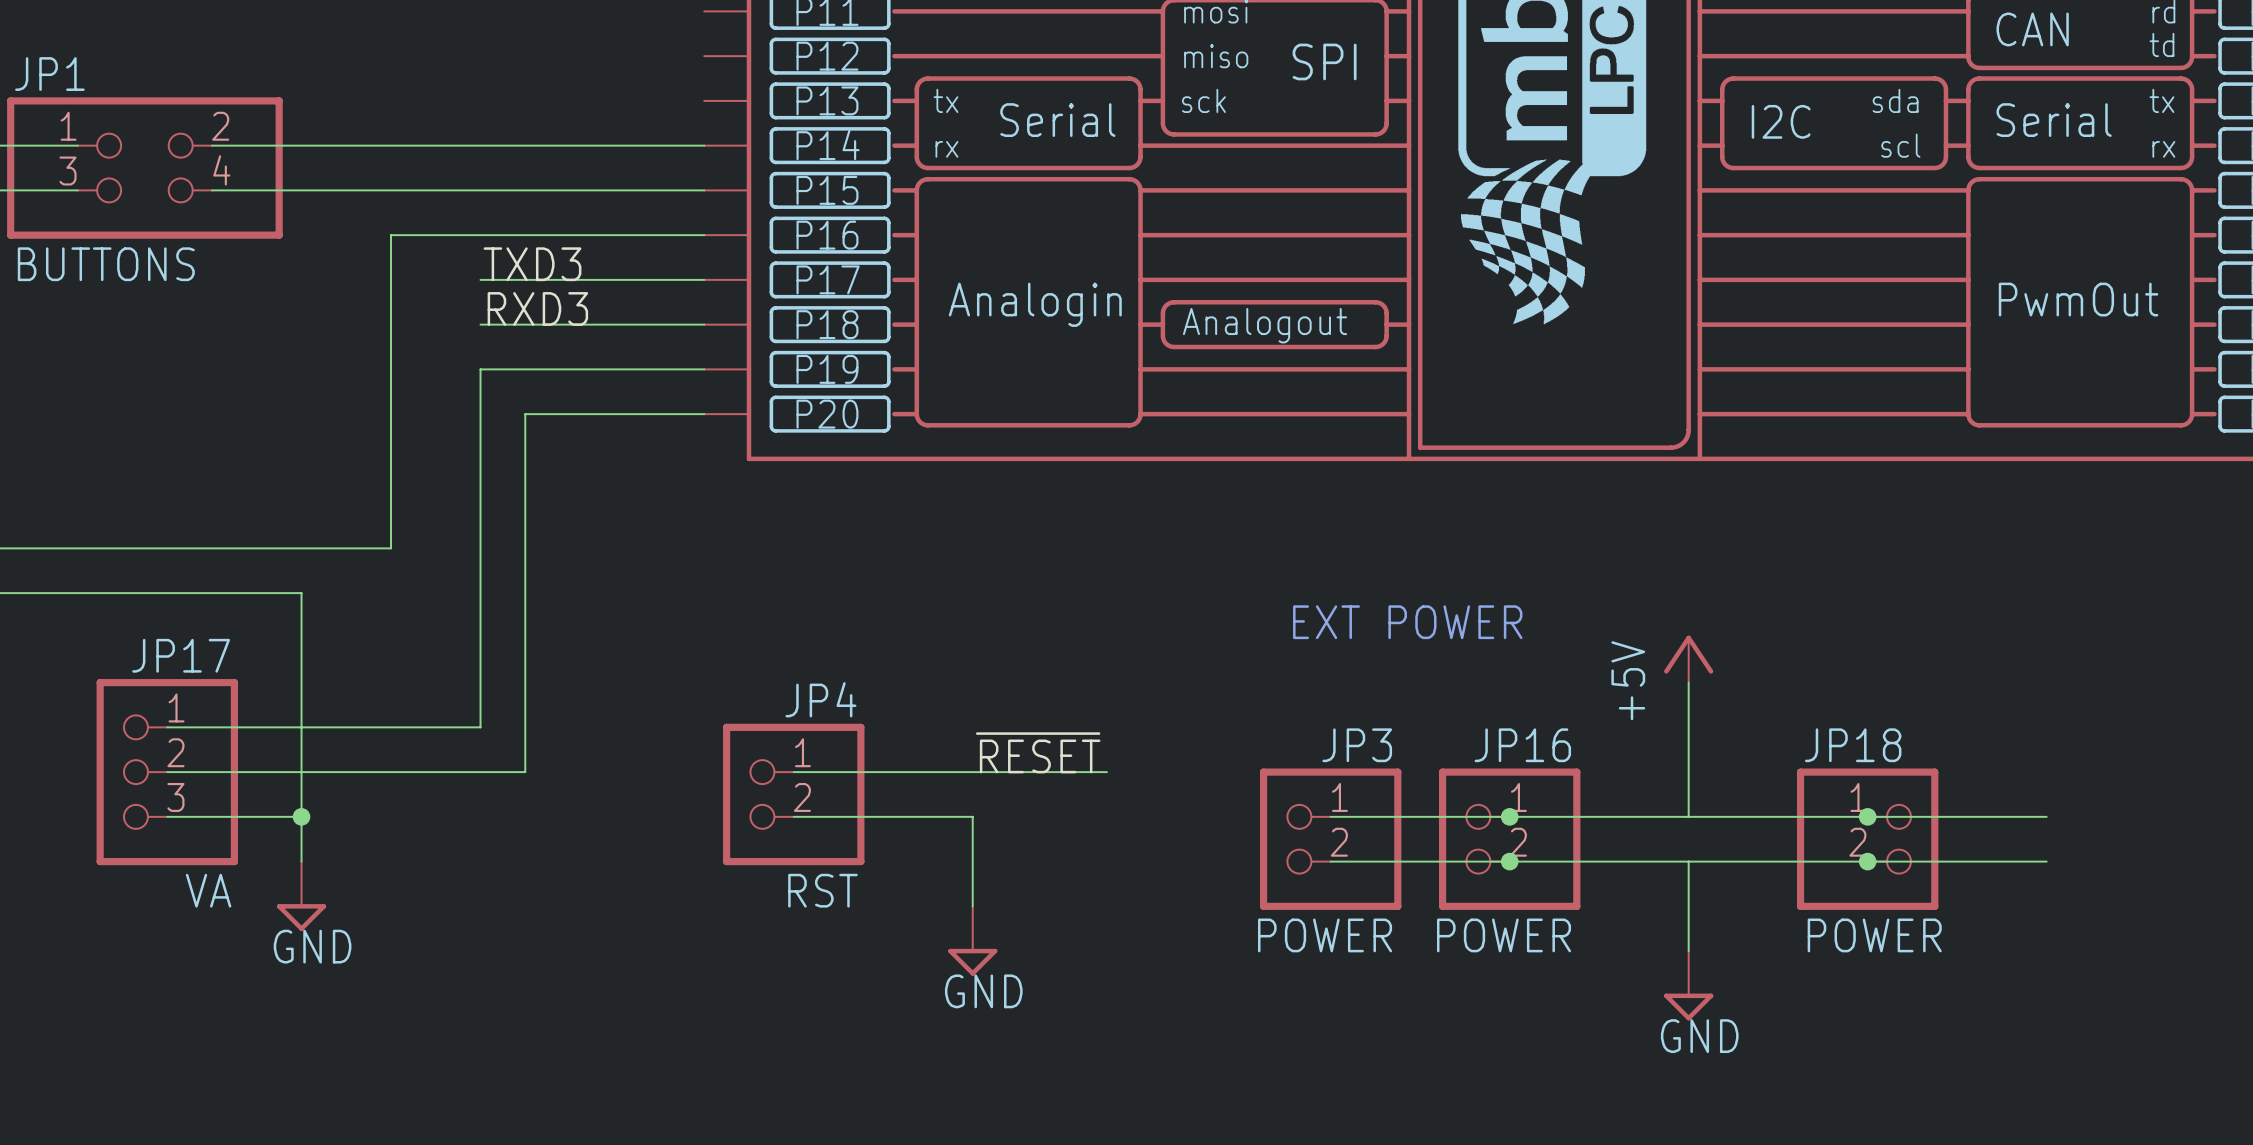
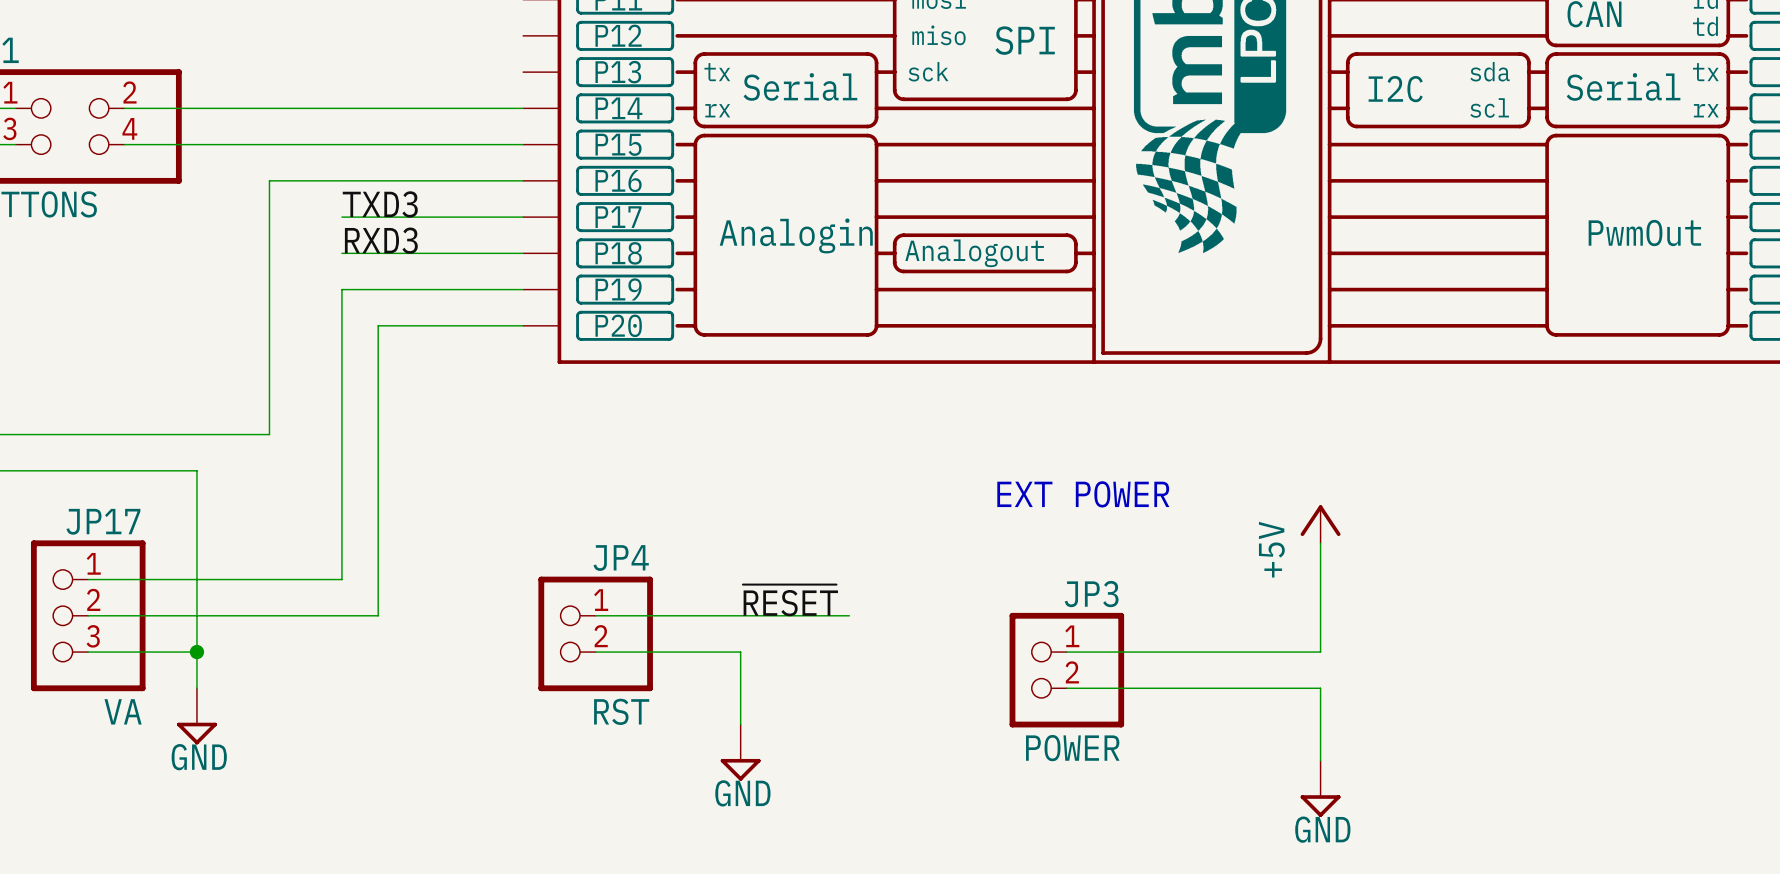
wire: (1330, 816) (1375, 816) -> none
junction: (1509, 816) -> none
wire: (1688, 816) (2046, 816) -> none
junction: (1867, 816) -> none
JP3 position: (1330, 839) -> (1066, 670)
JP16: POWER (1509, 839) -> none
JP18: POWER (1867, 839) -> none
wire: (1330, 861) (1375, 861) -> none
junction: (1509, 861) -> none
wire: (1688, 861) (2046, 861) -> none
junction: (1867, 861) -> none

